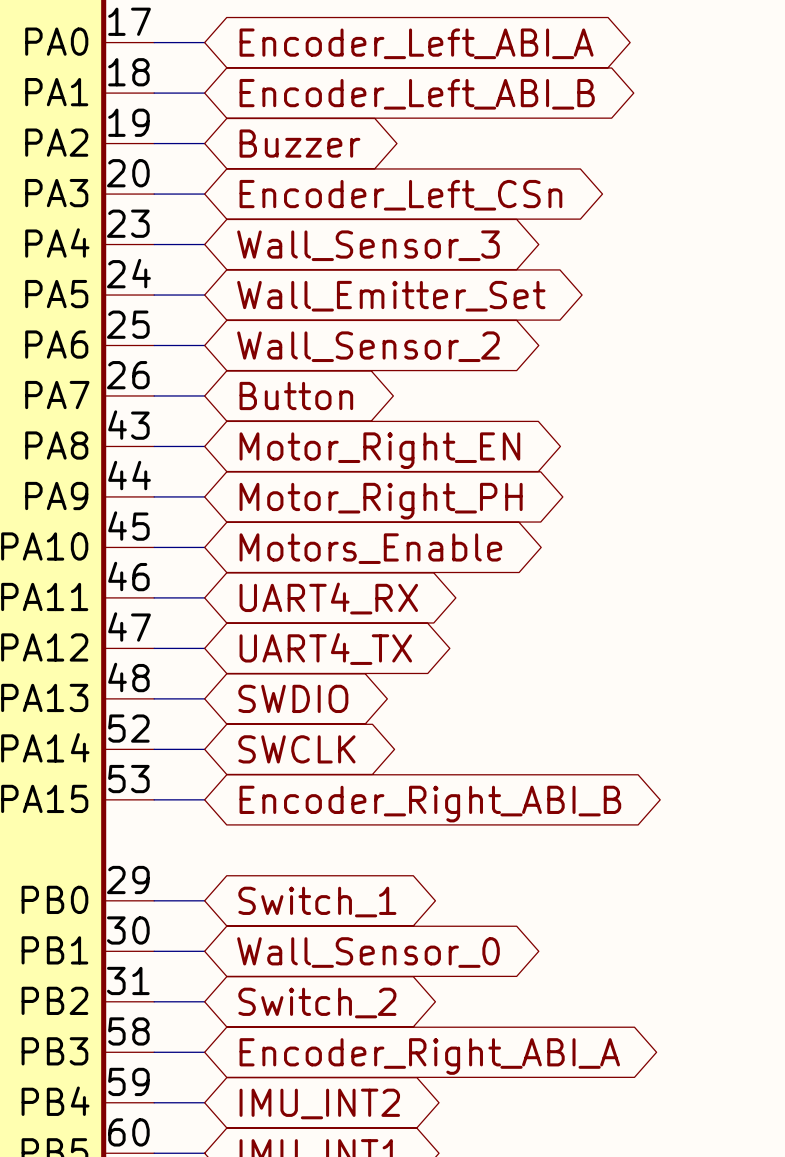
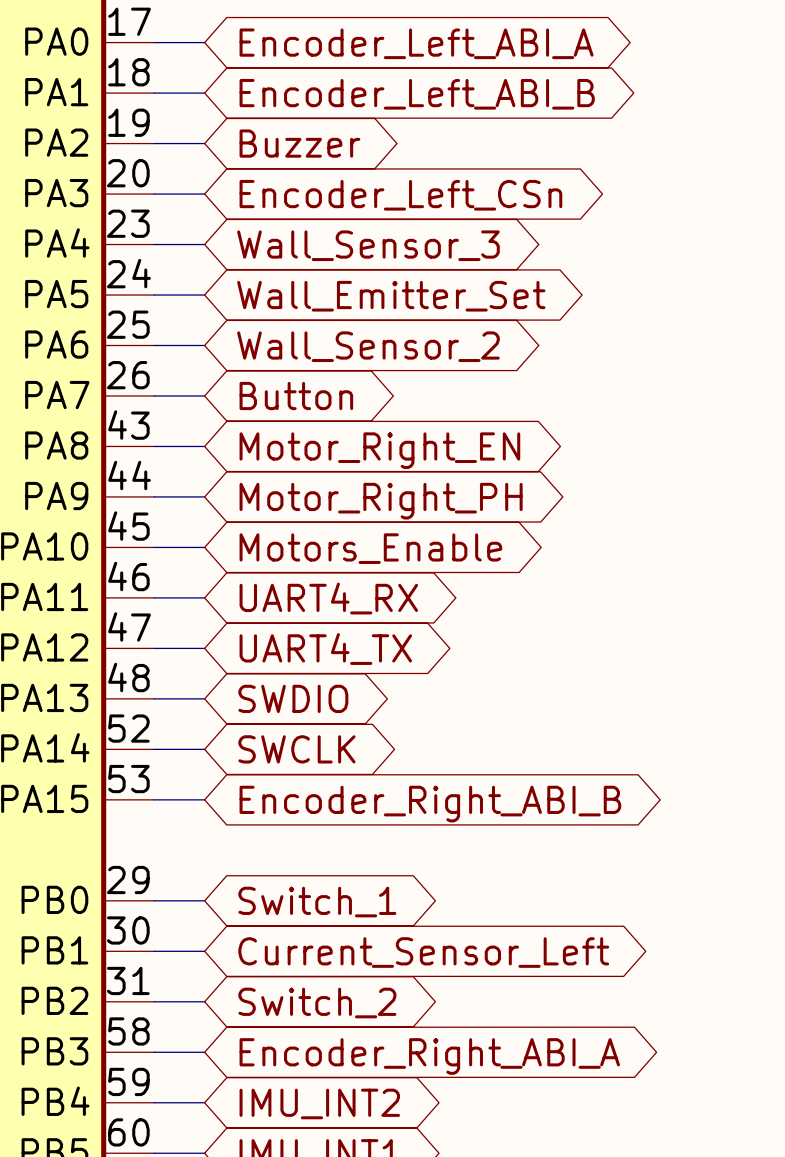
global label: Wall_Sensor_0 (368, 952) -> Current_Sensor_Left (423, 952)

